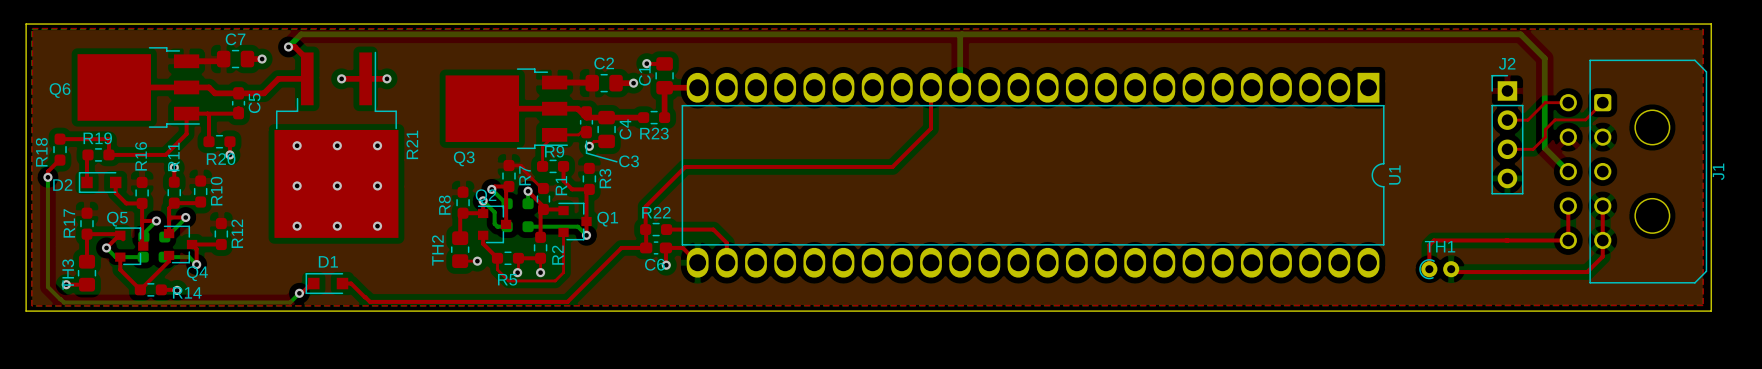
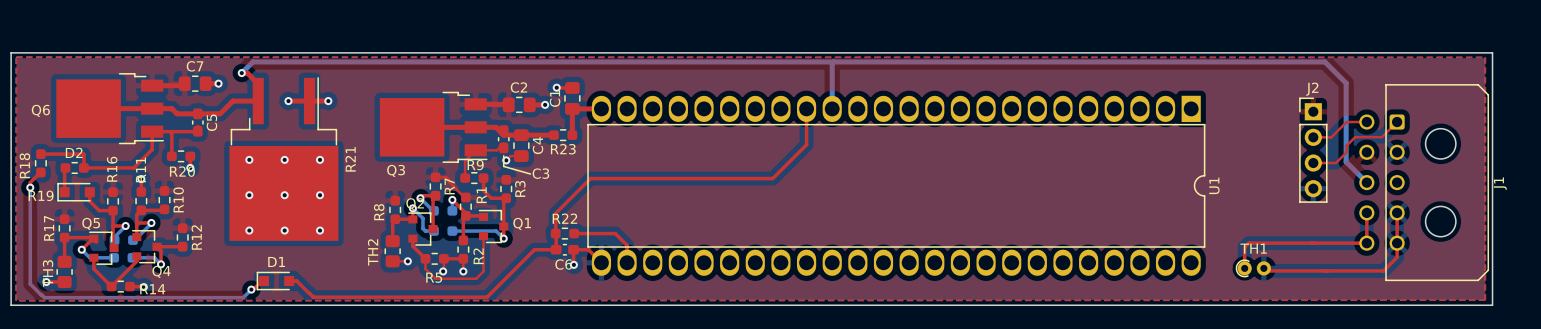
R19 name position: R19 (97, 138) -> R19 (41, 195)
D2 name position: D2 (62, 184) -> D2 (74, 152)

